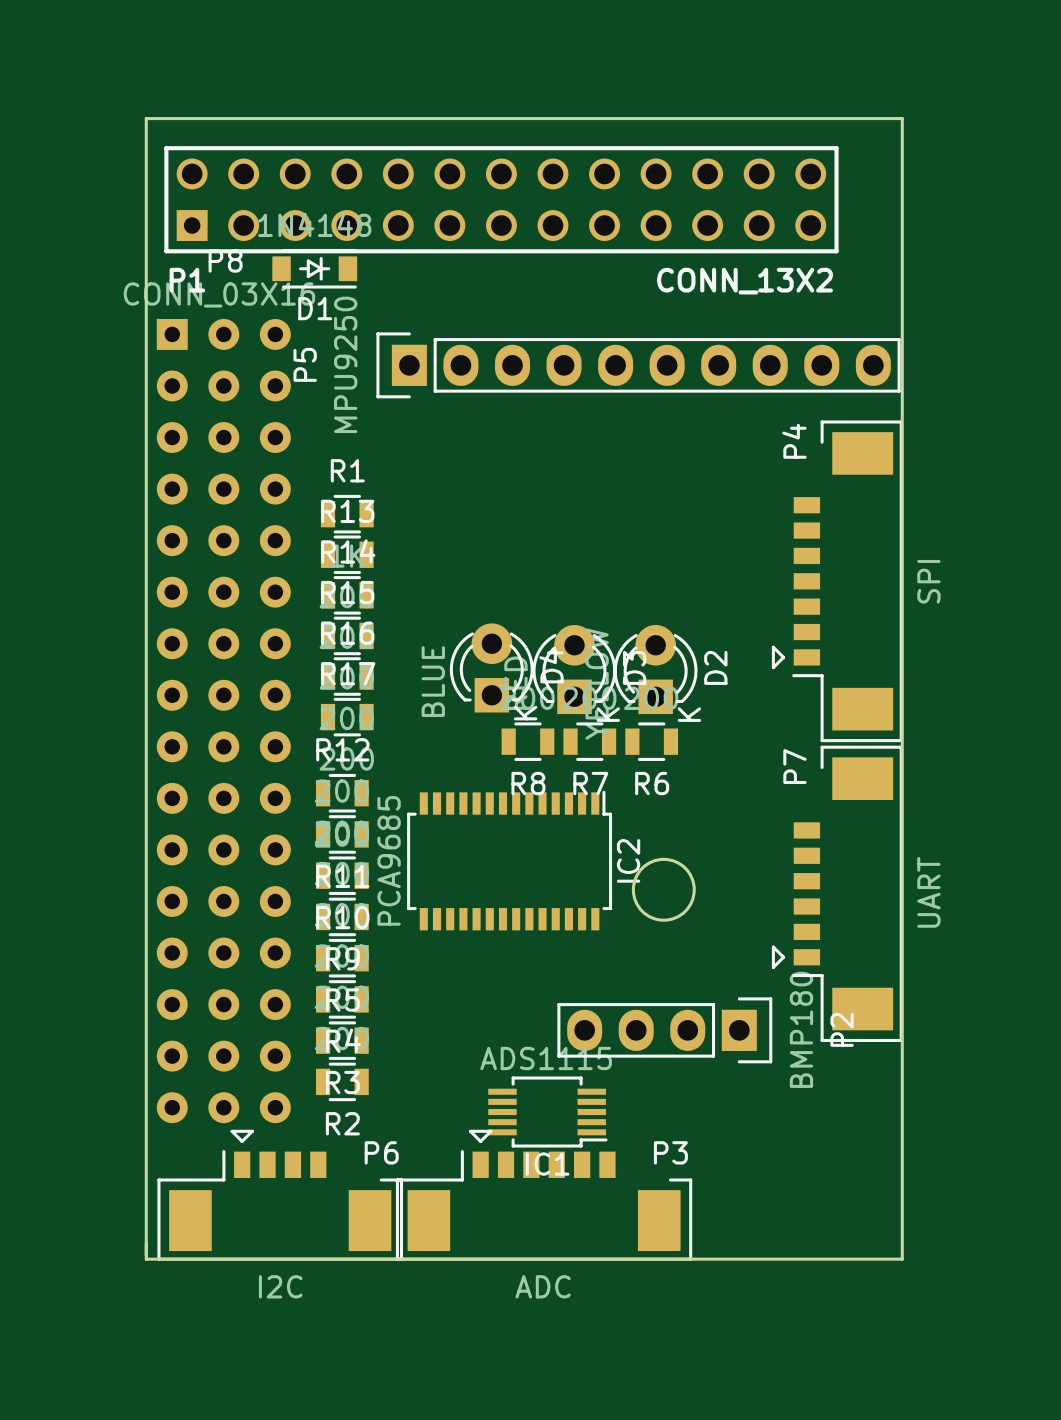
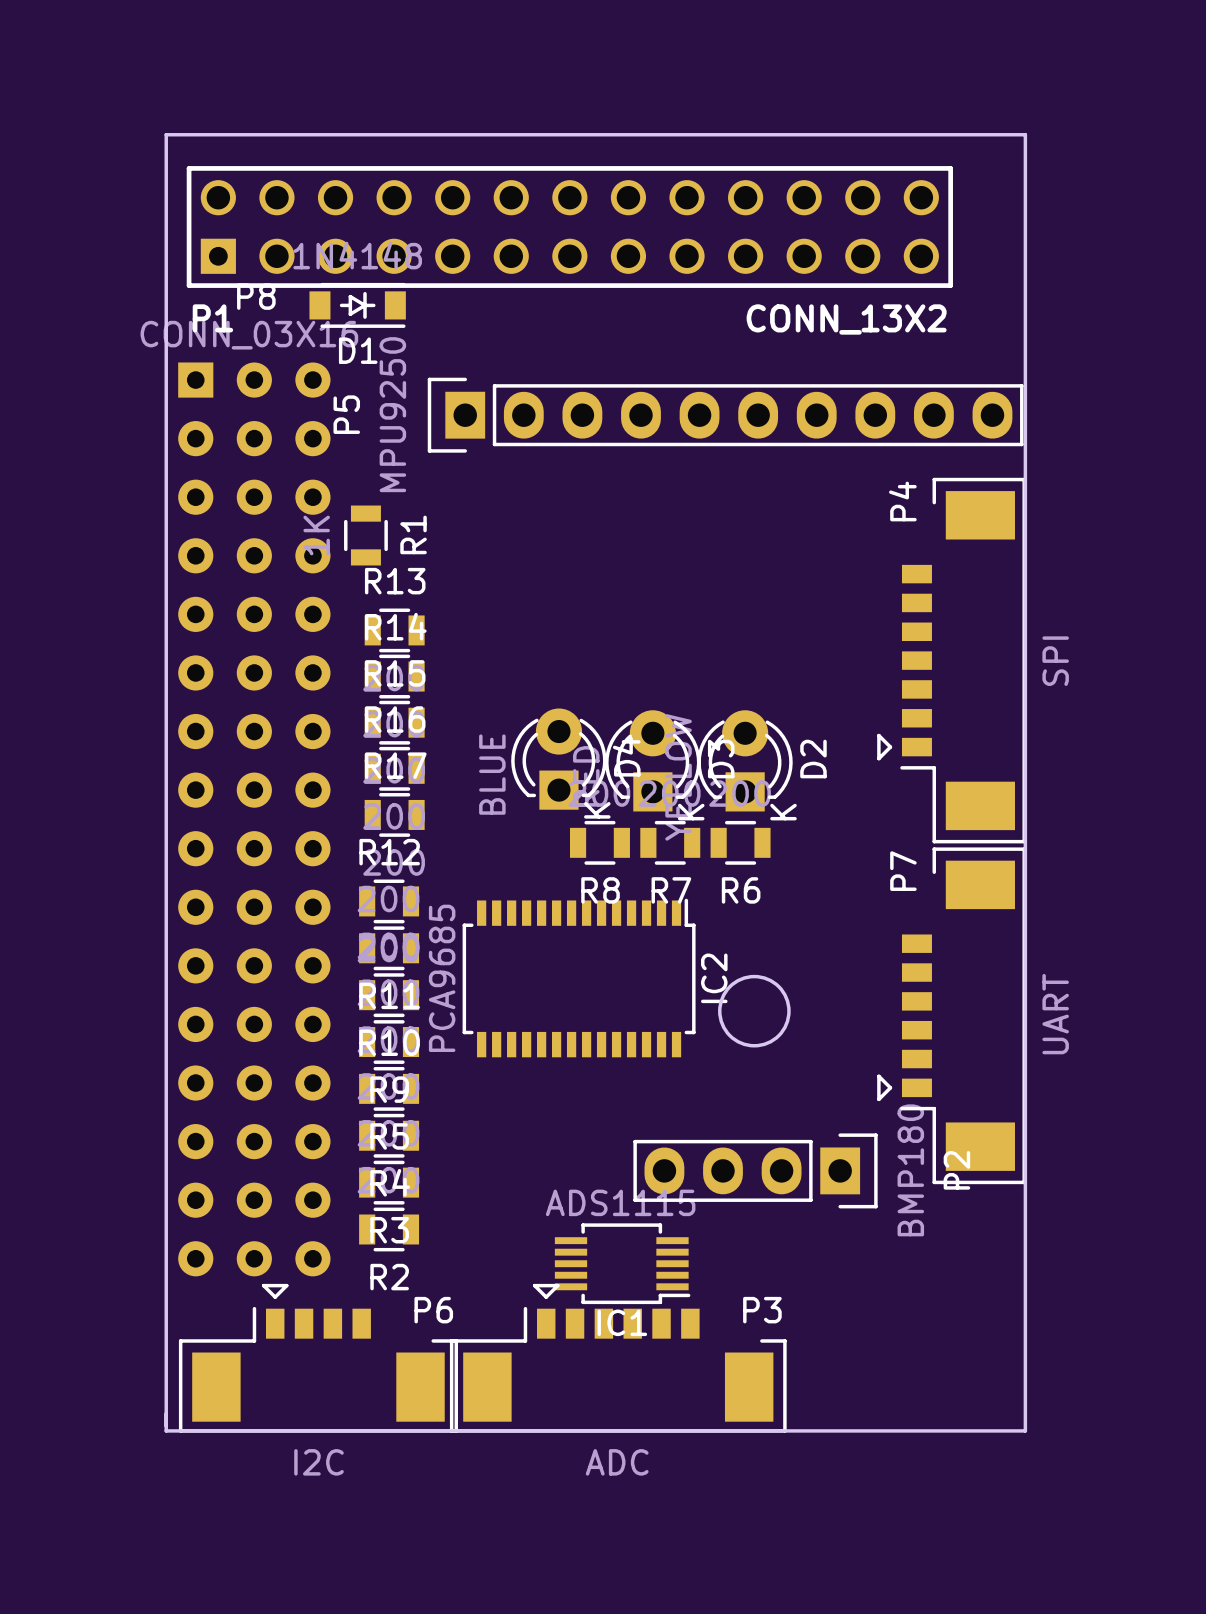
R1 rotation: 0° (347, 514) -> 90° clockwise (365, 535)
R1 position: (347, 514) -> (365, 535)

